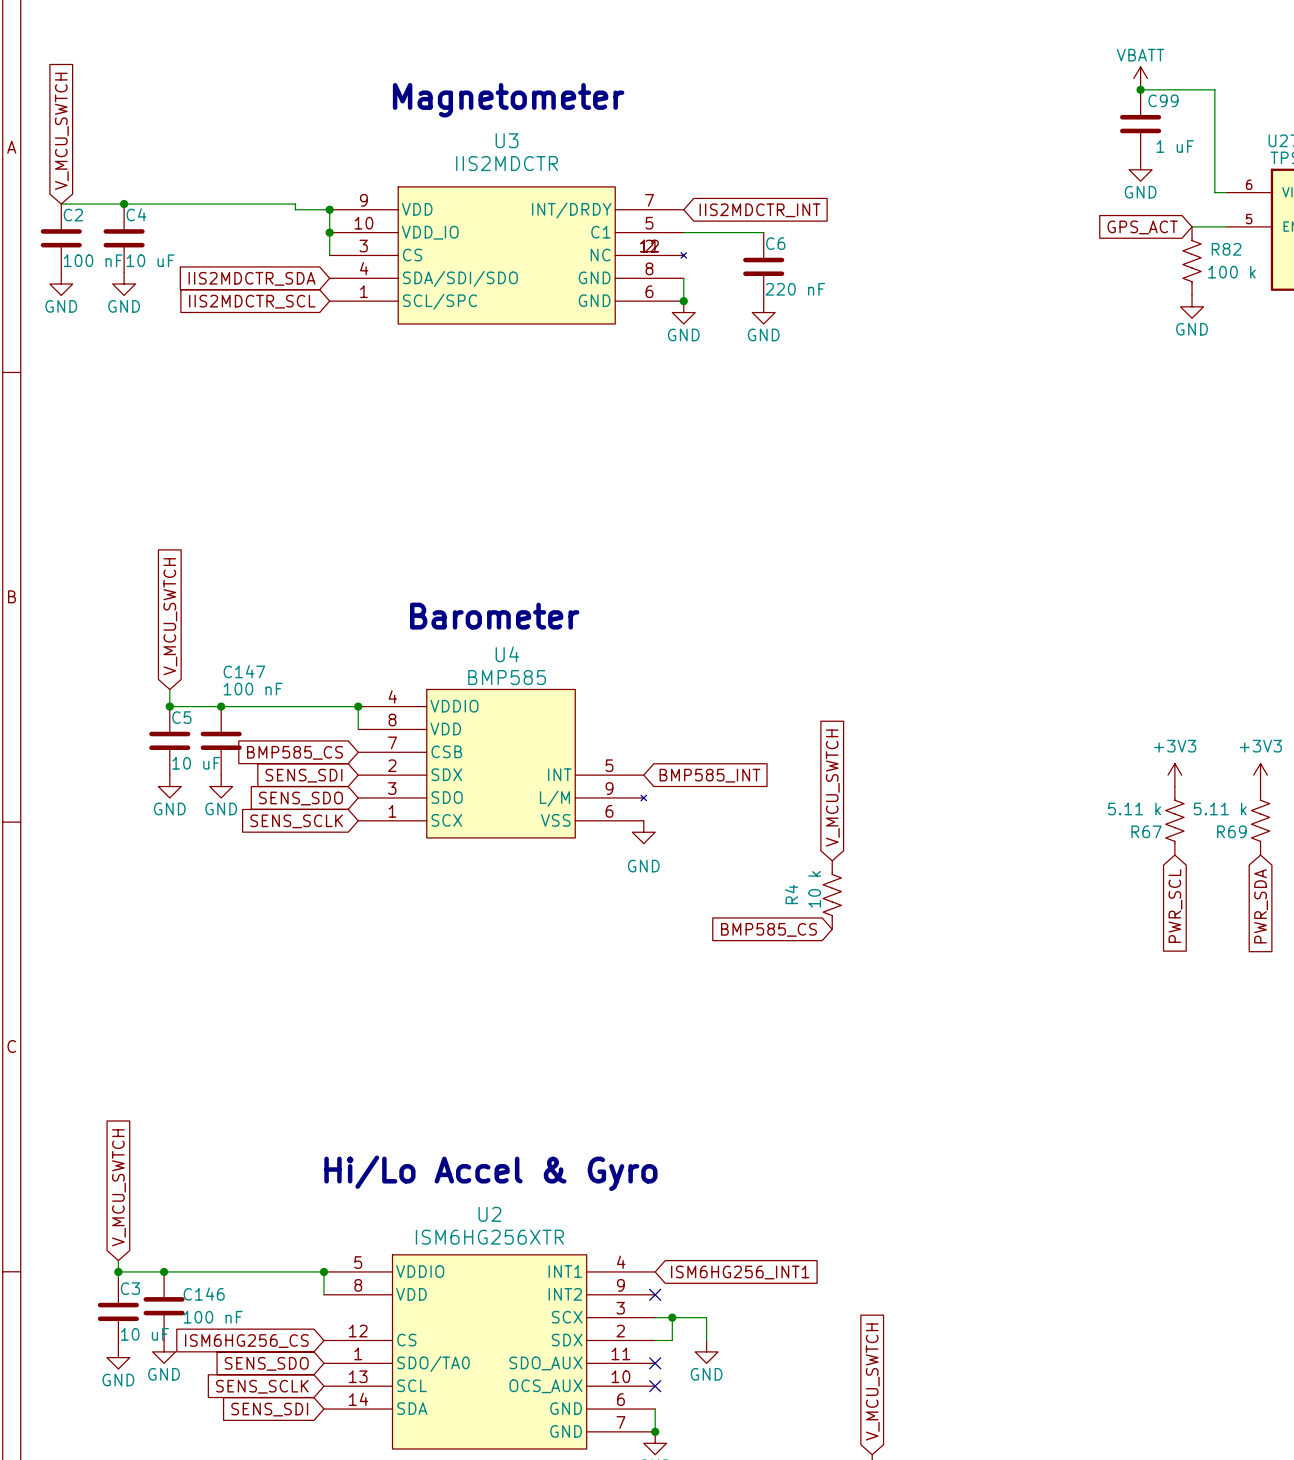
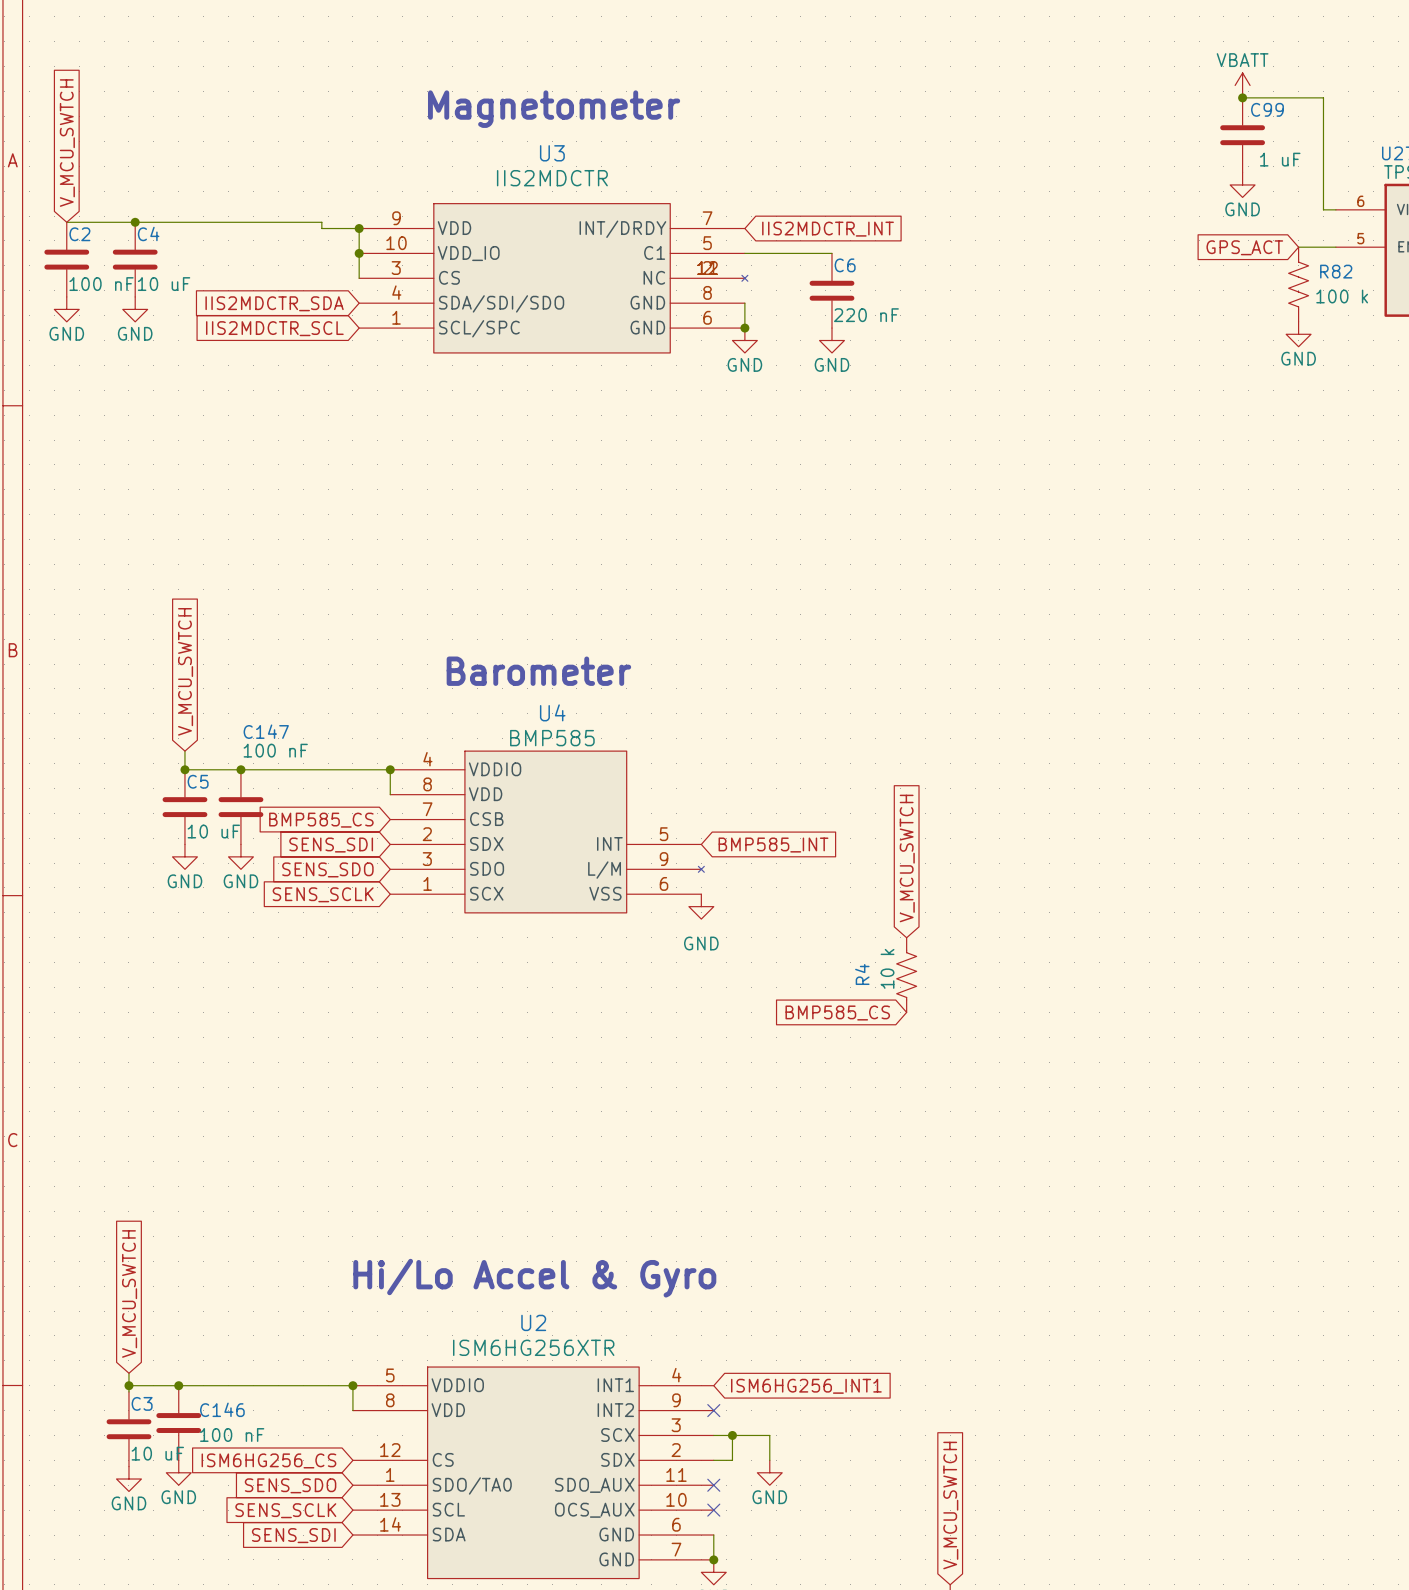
power symbol: +3V3 (1174, 775) -> none
power symbol: +3V3 (1260, 775) -> none
R67: 5.11 k (1174, 820) -> none
R69: 5.11 k (1260, 820) -> none
global label: PWR_SCL (1175, 906) -> none
global label: PWR_SDA (1261, 906) -> none

